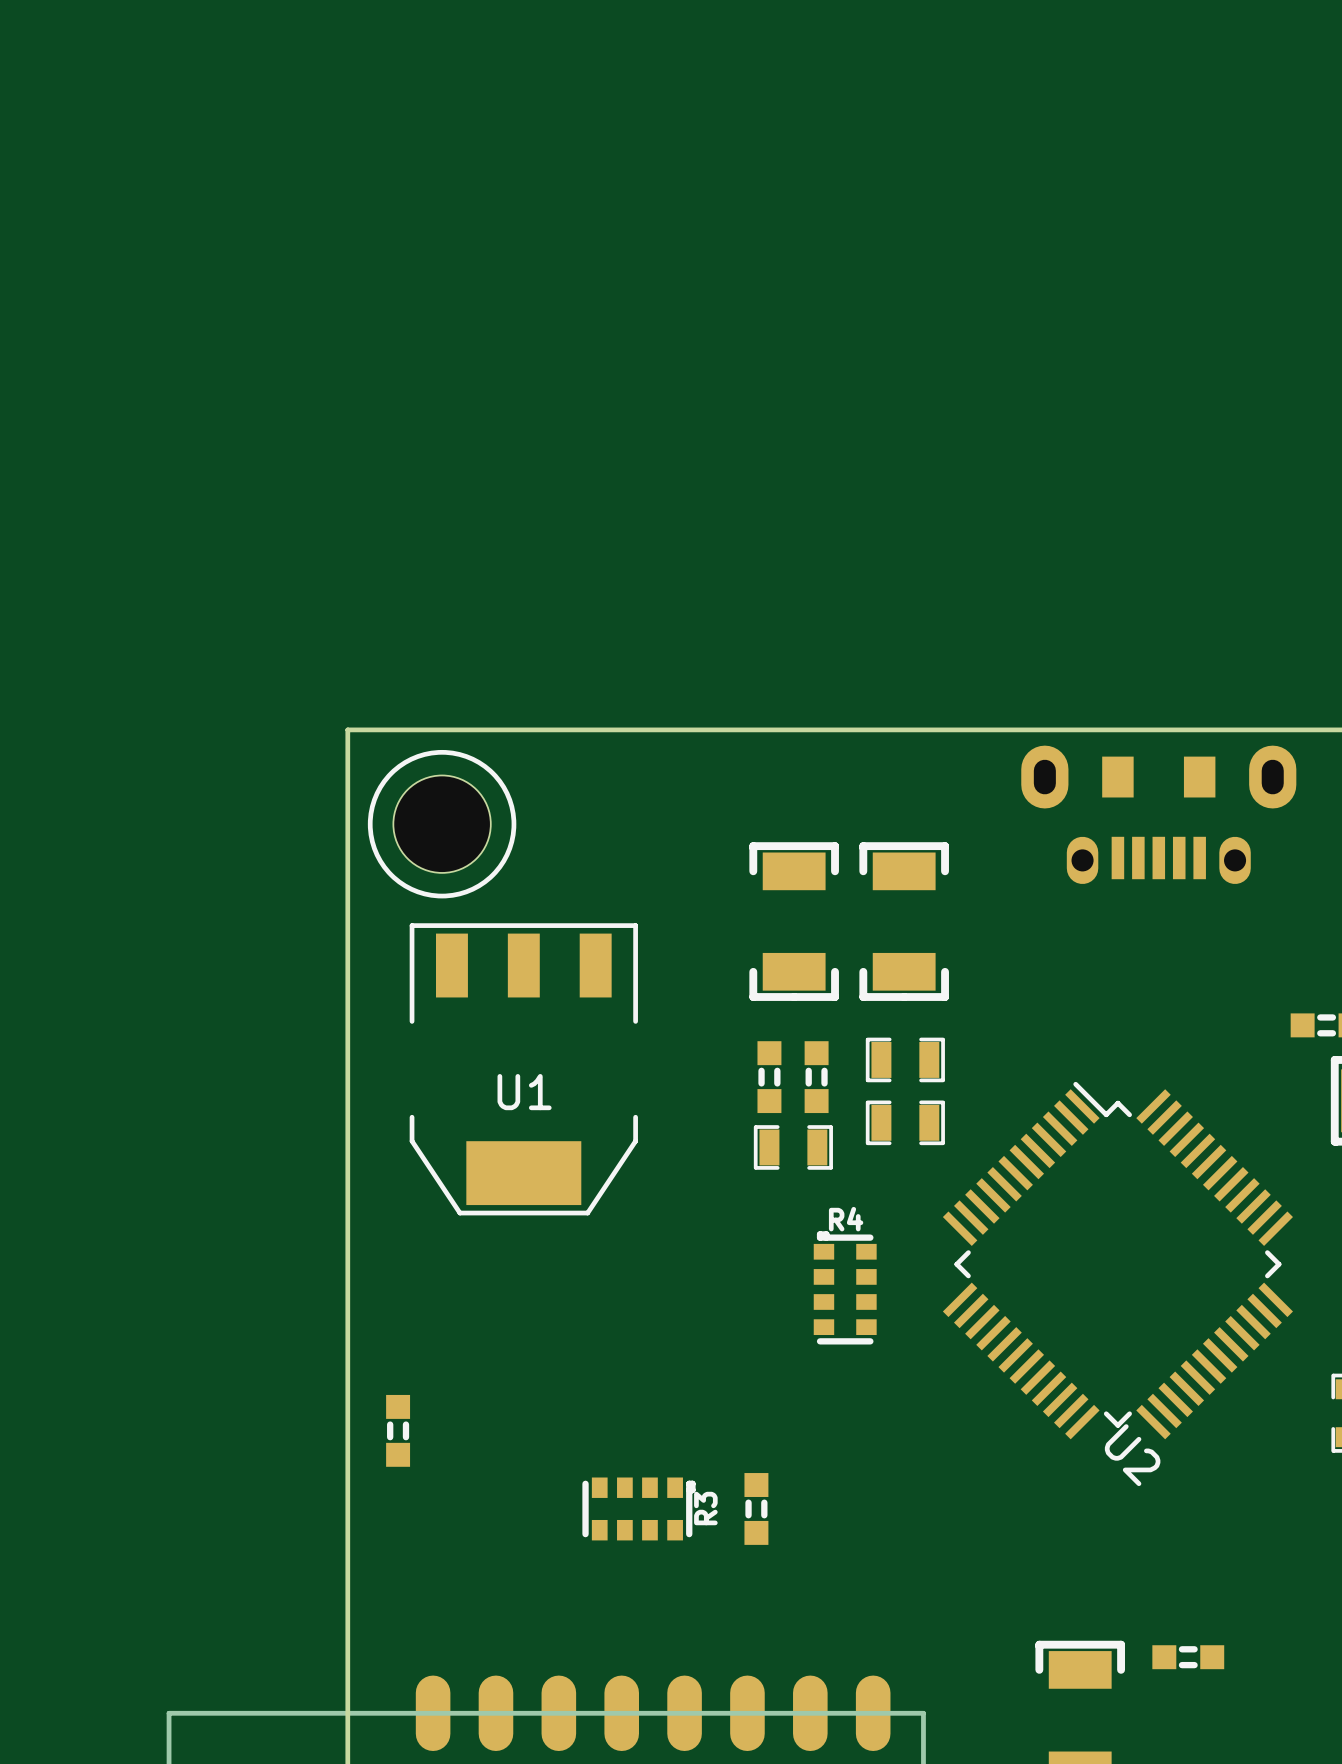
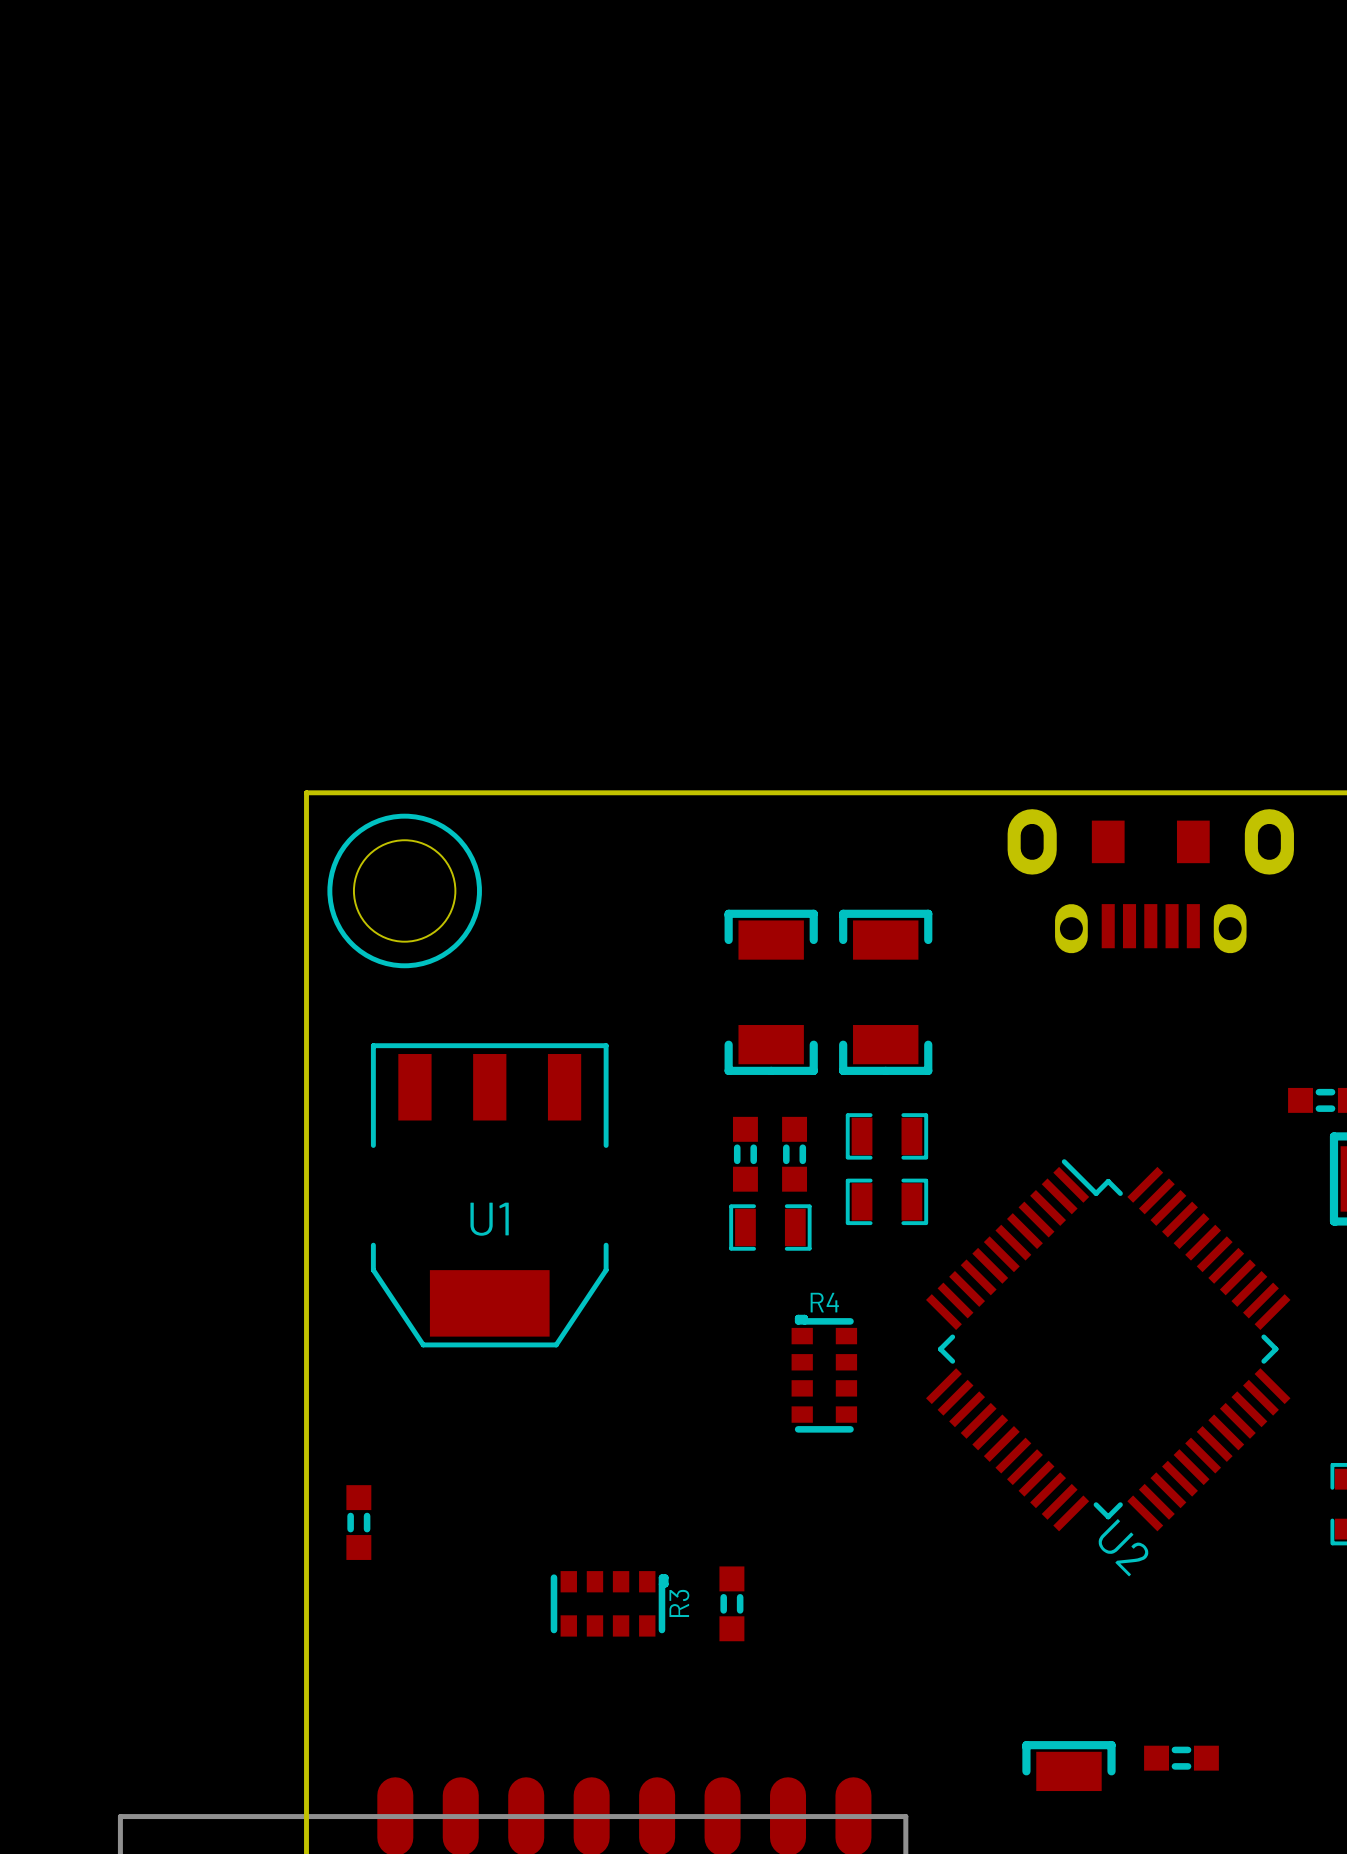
U1 position: (523, 1069) -> (489, 1195)

